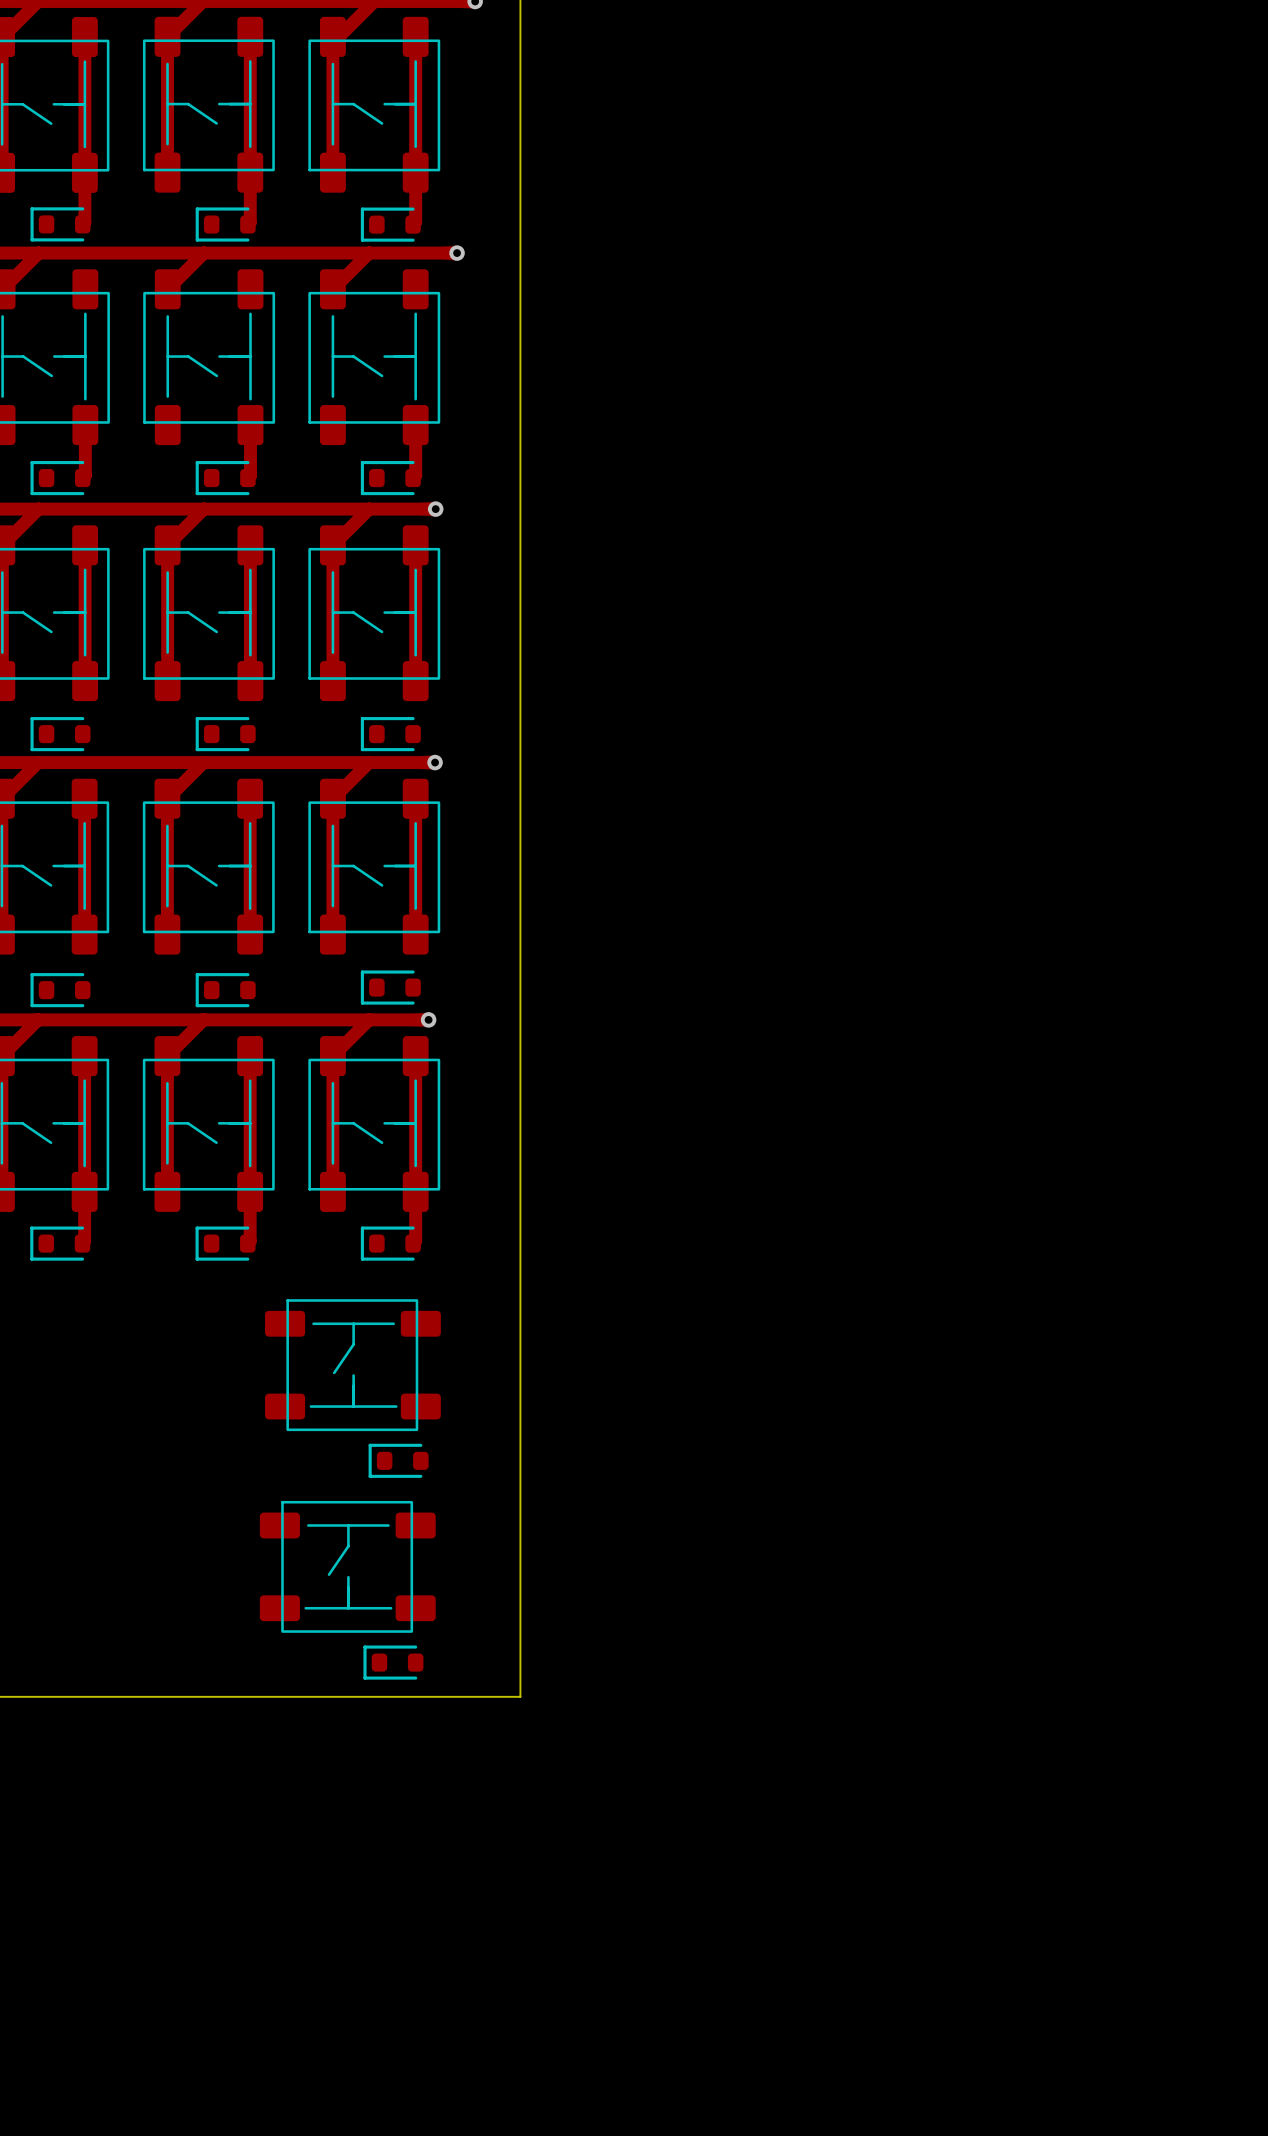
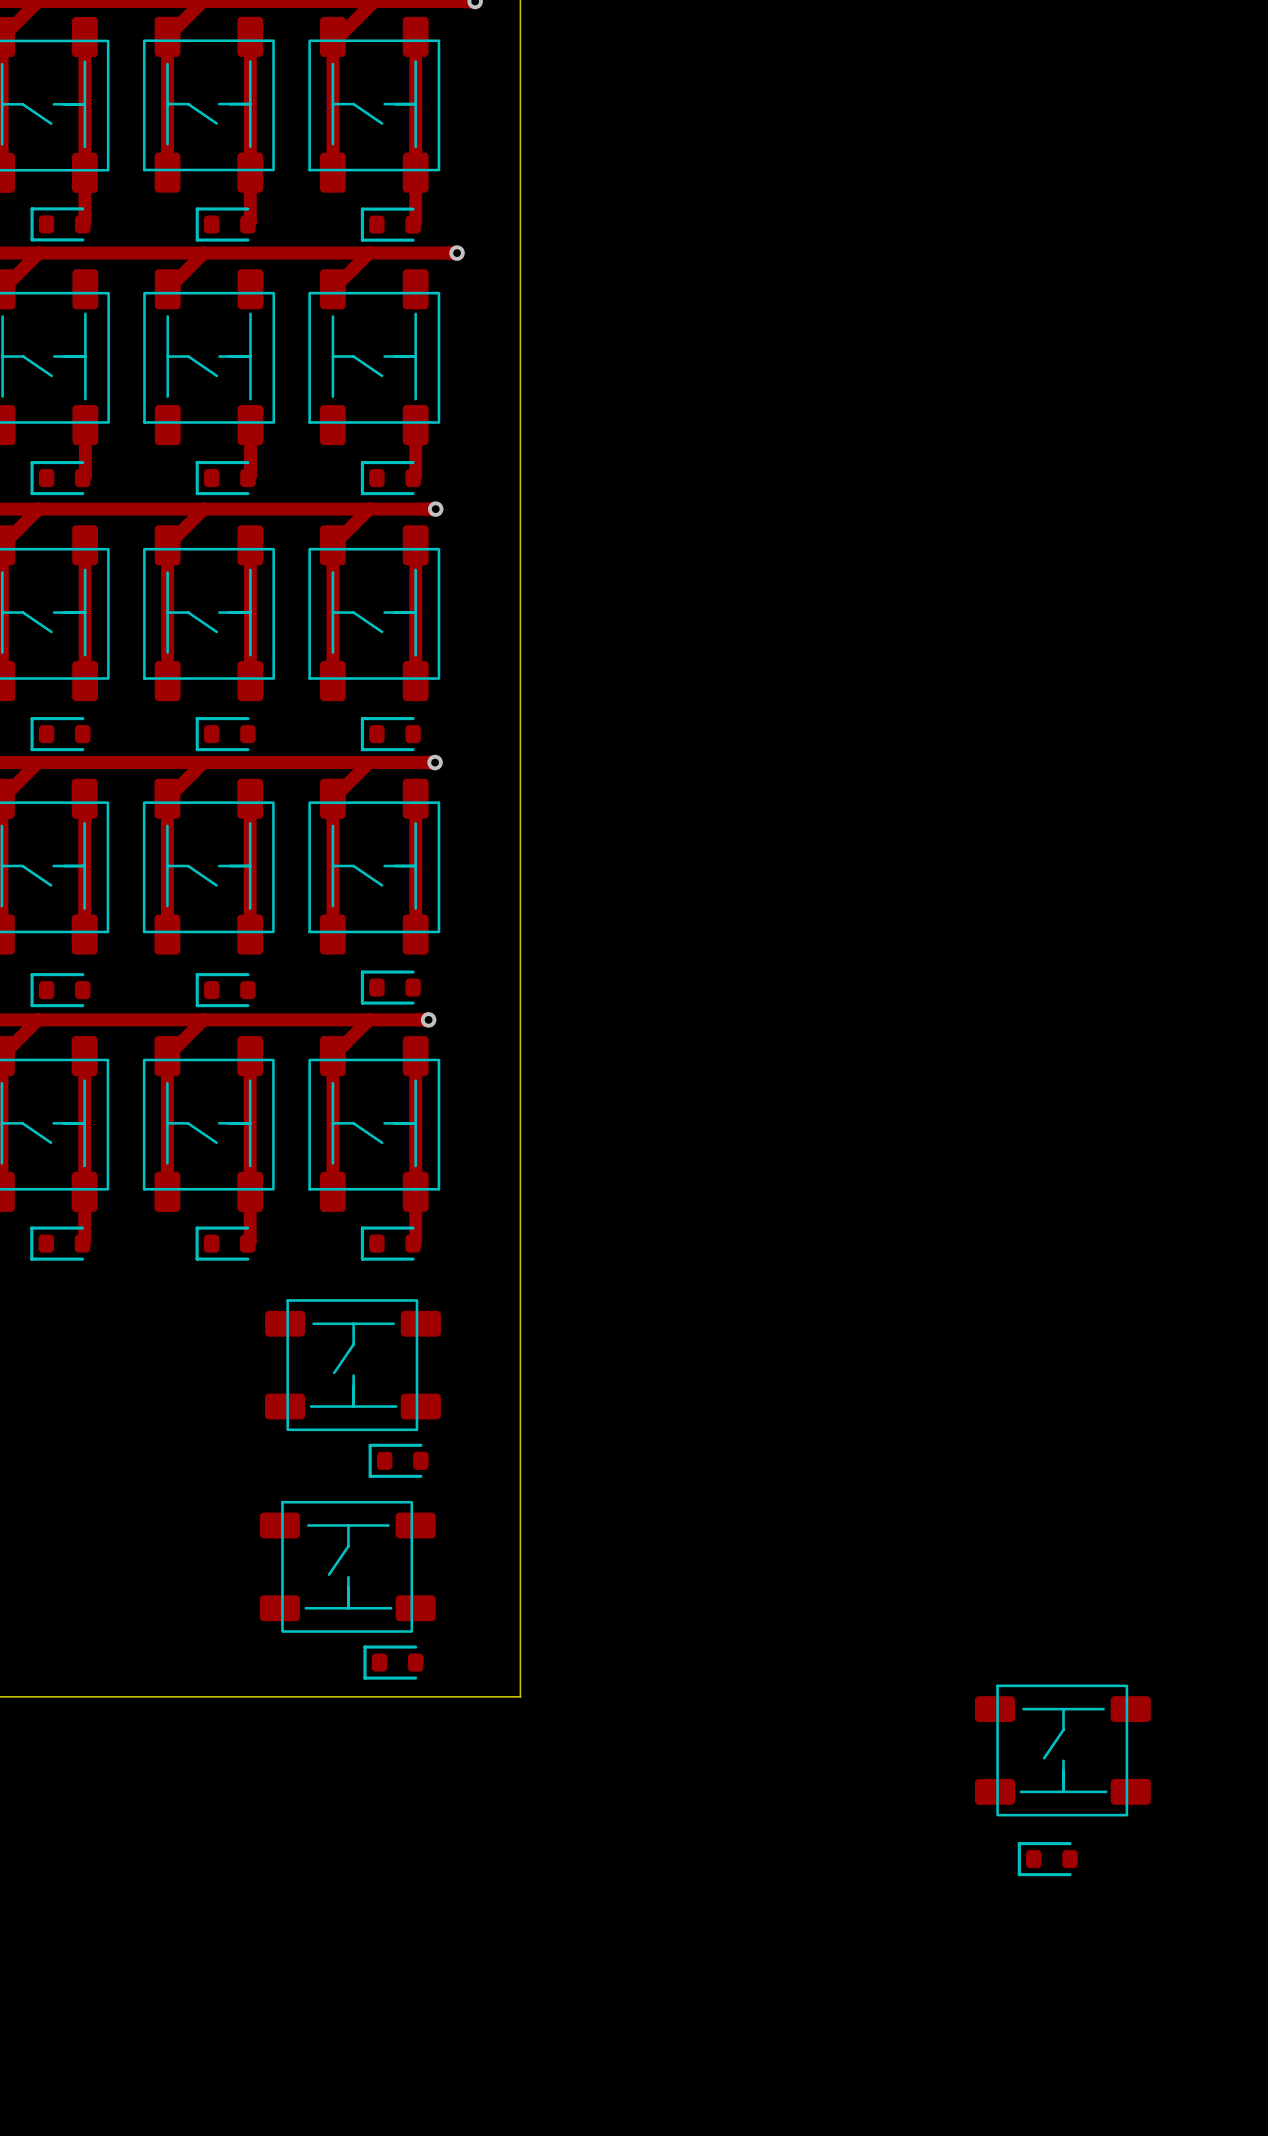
part: none -> (1062, 1750)
part: none -> (1047, 1859)

